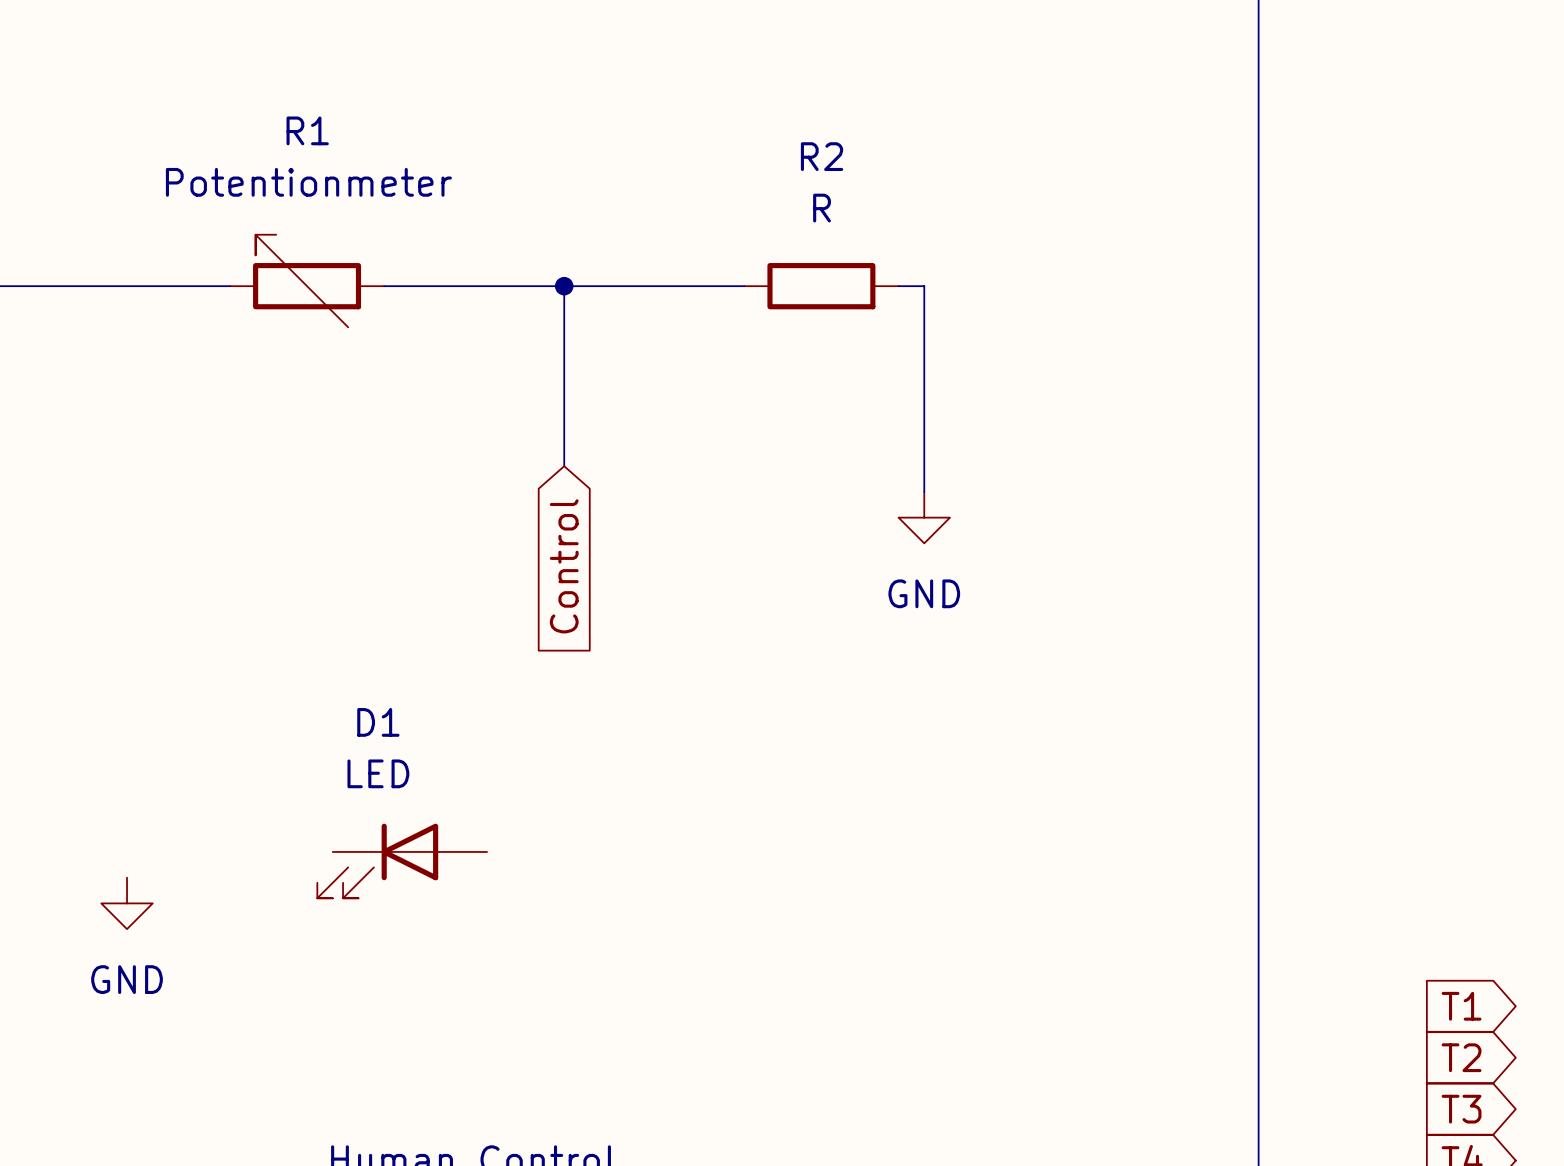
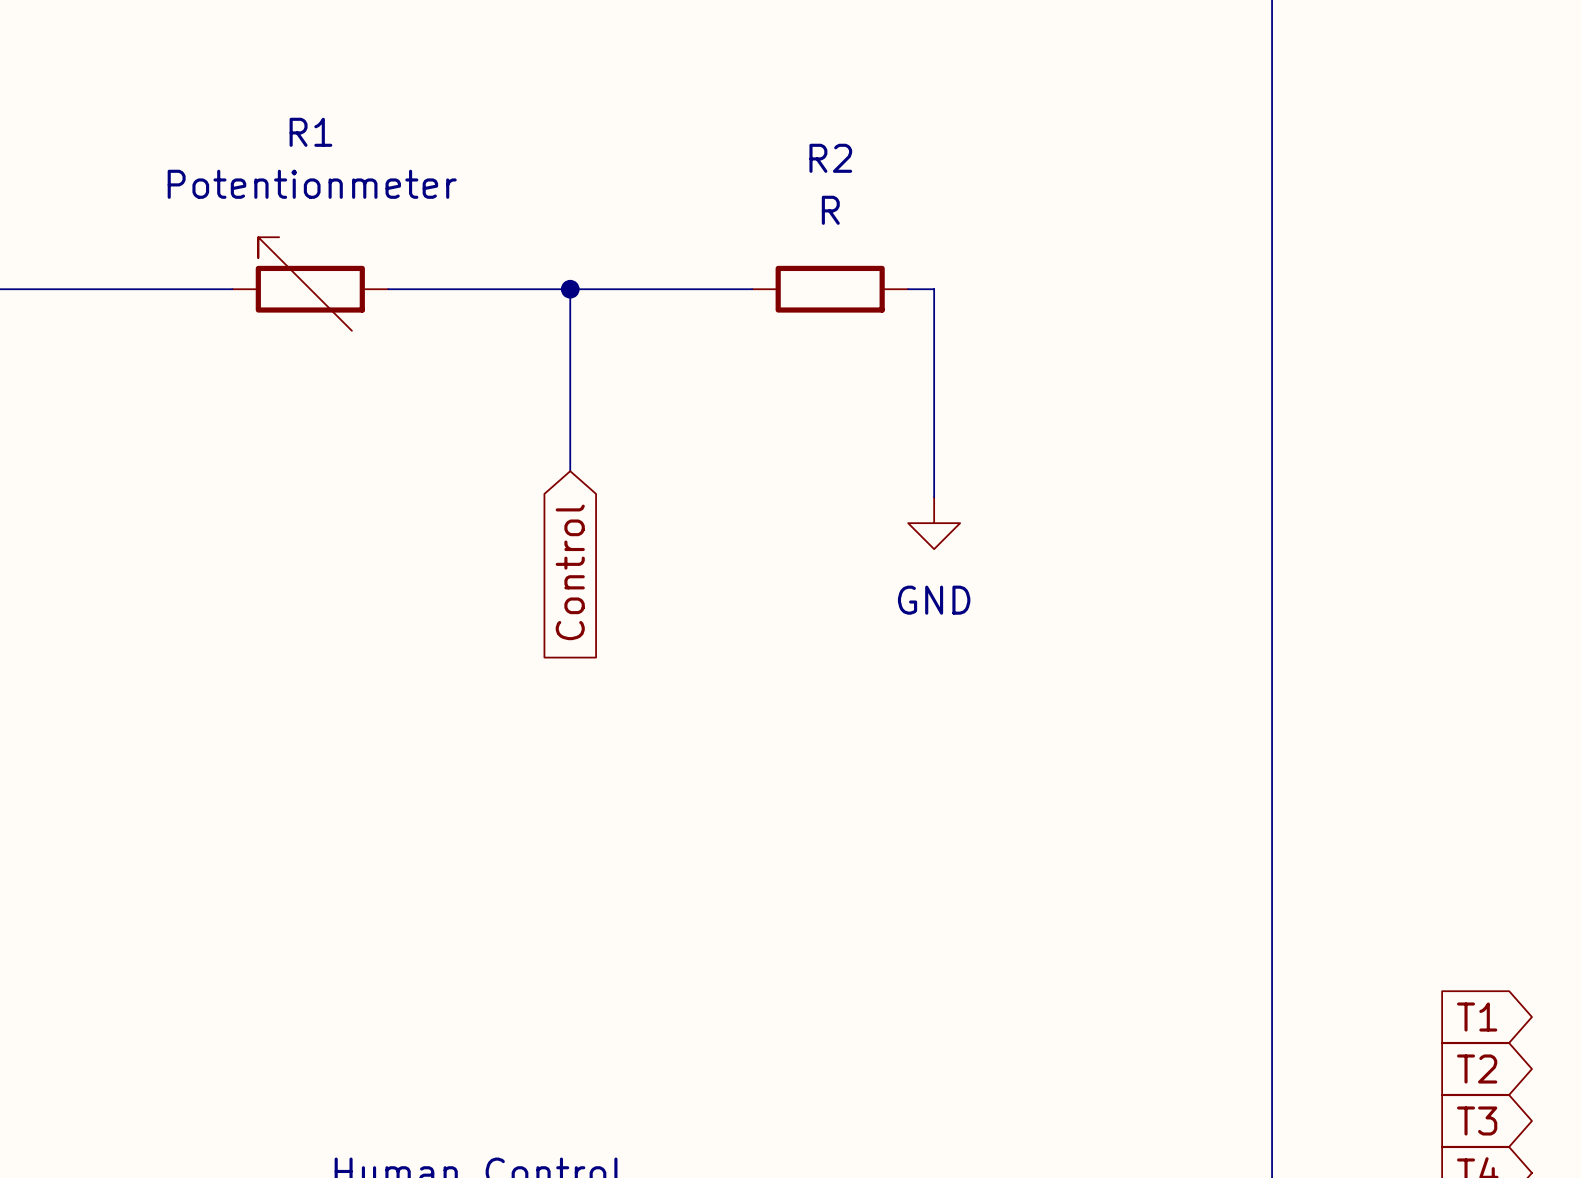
D1: LED (402, 860) -> none
power symbol: GND (127, 903) -> none

